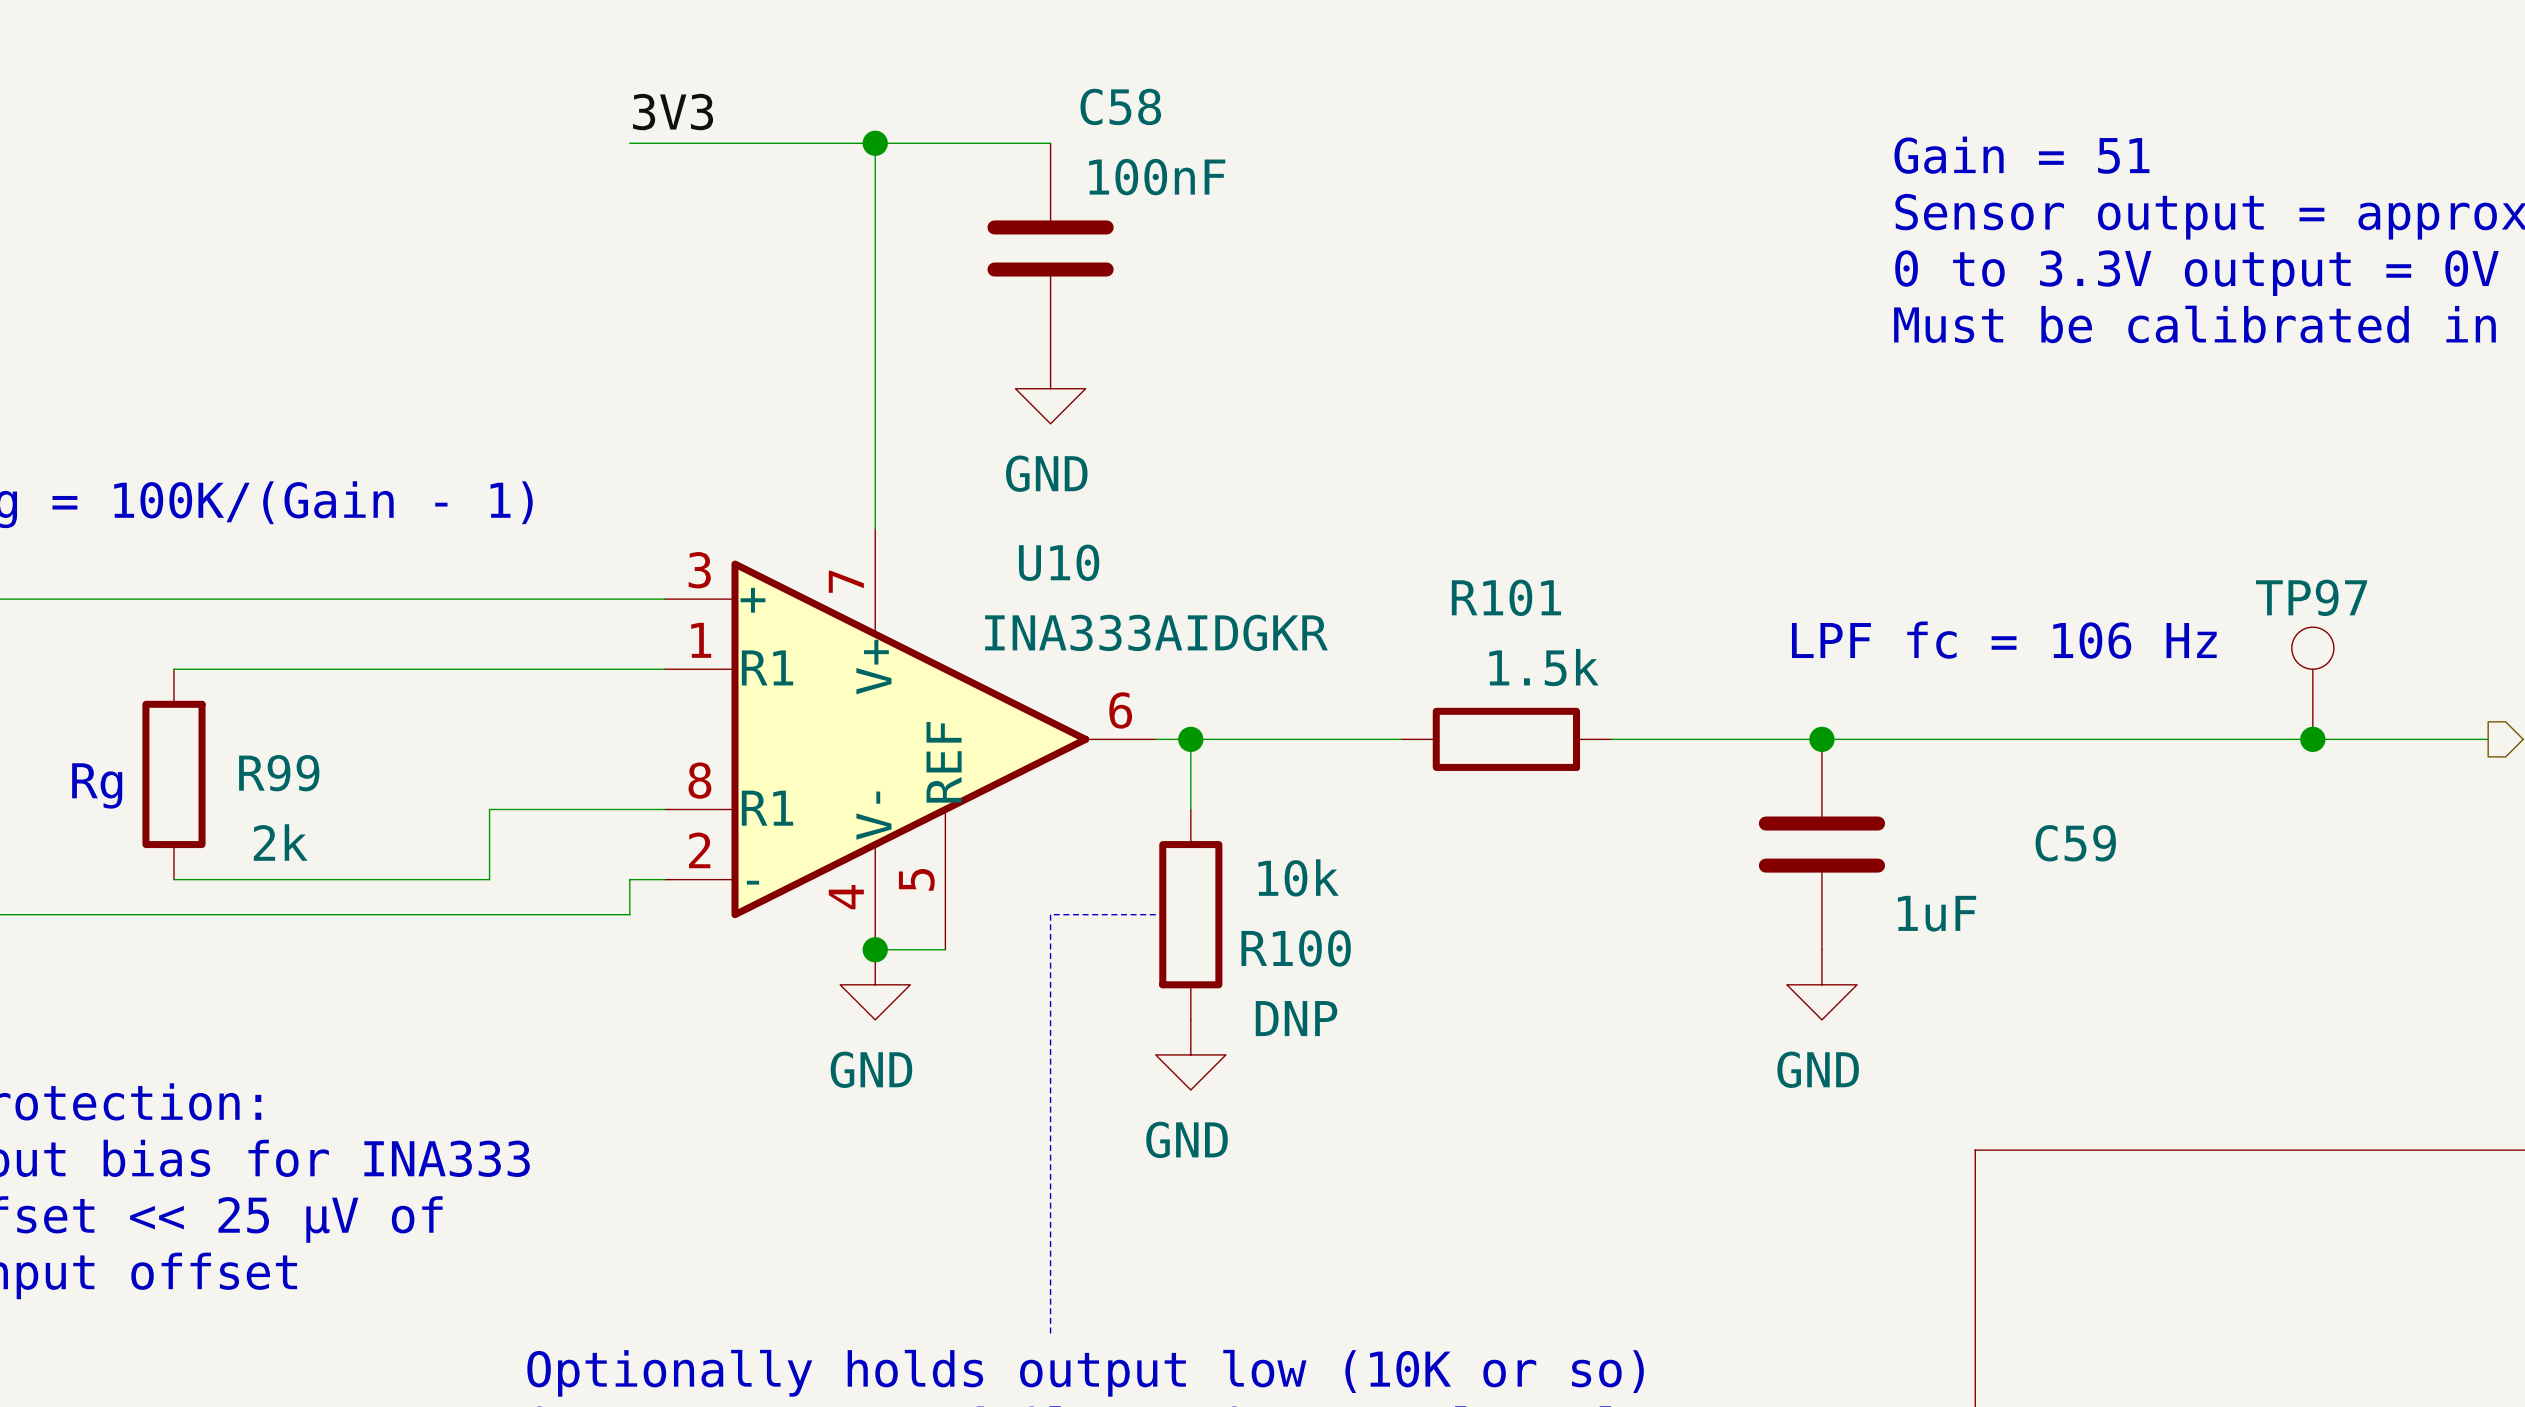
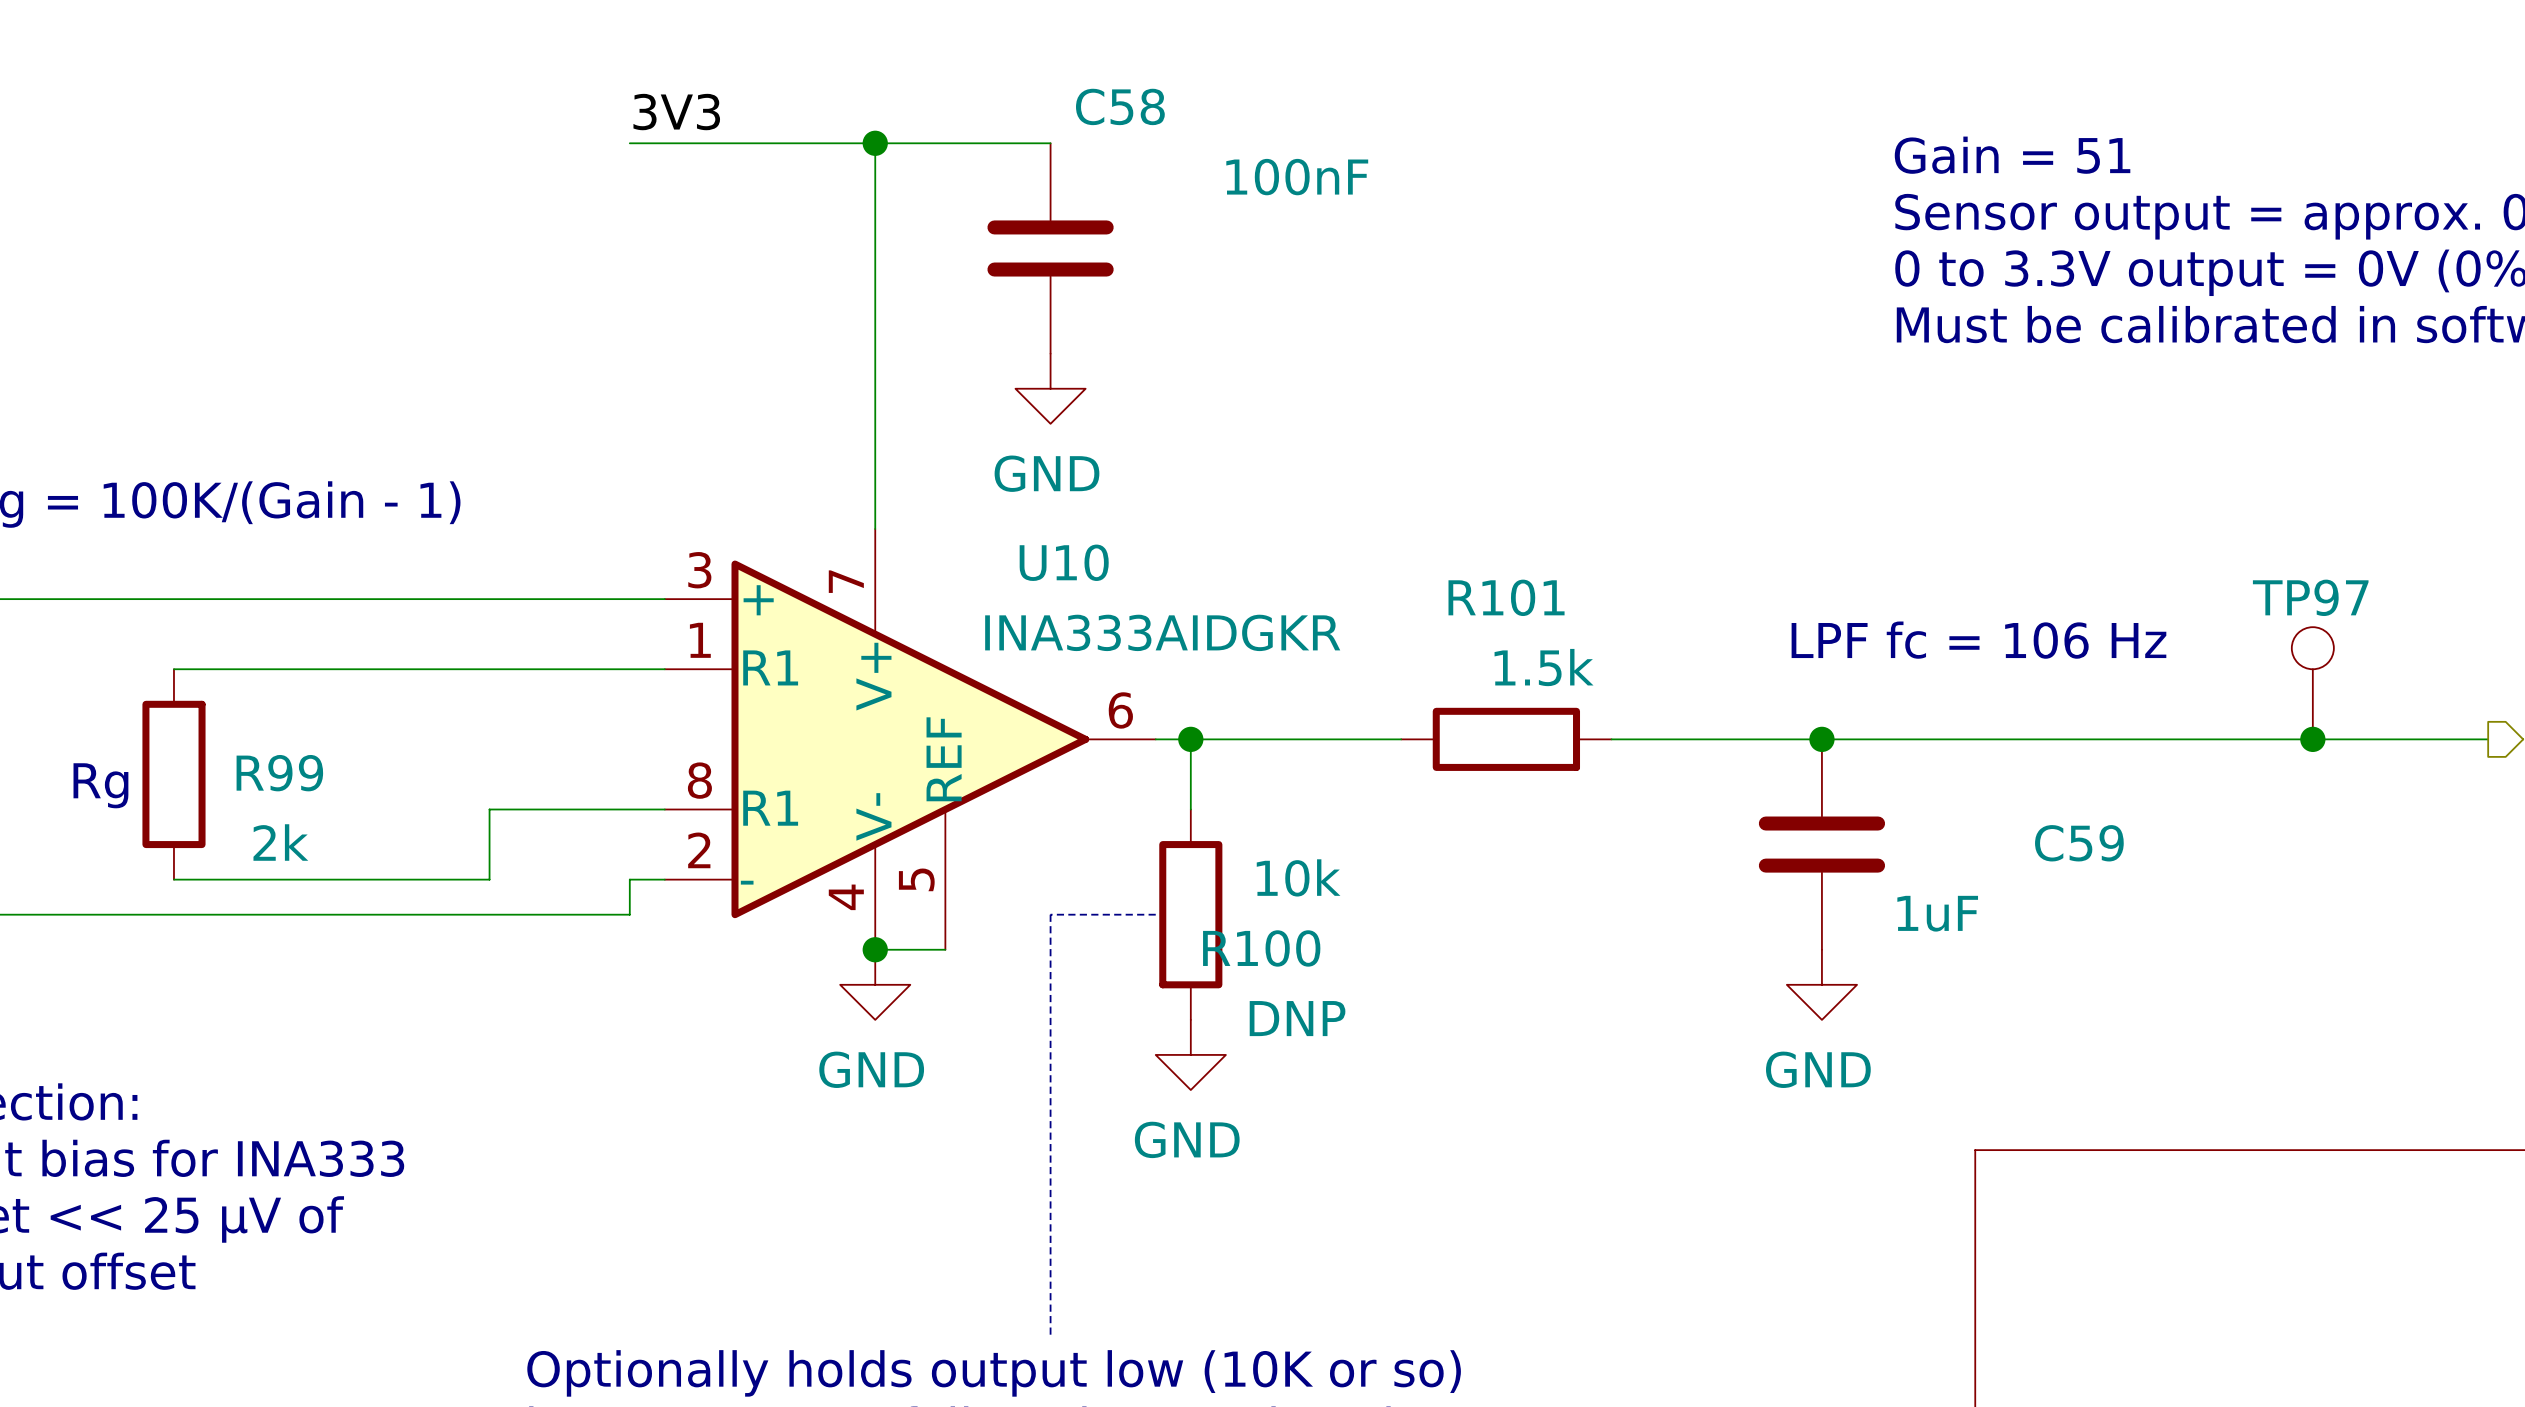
C58 value position: 100nF (1157, 177) -> 100nF (1297, 177)
R100 name position: R100 (1296, 948) -> R100 (1261, 948)

